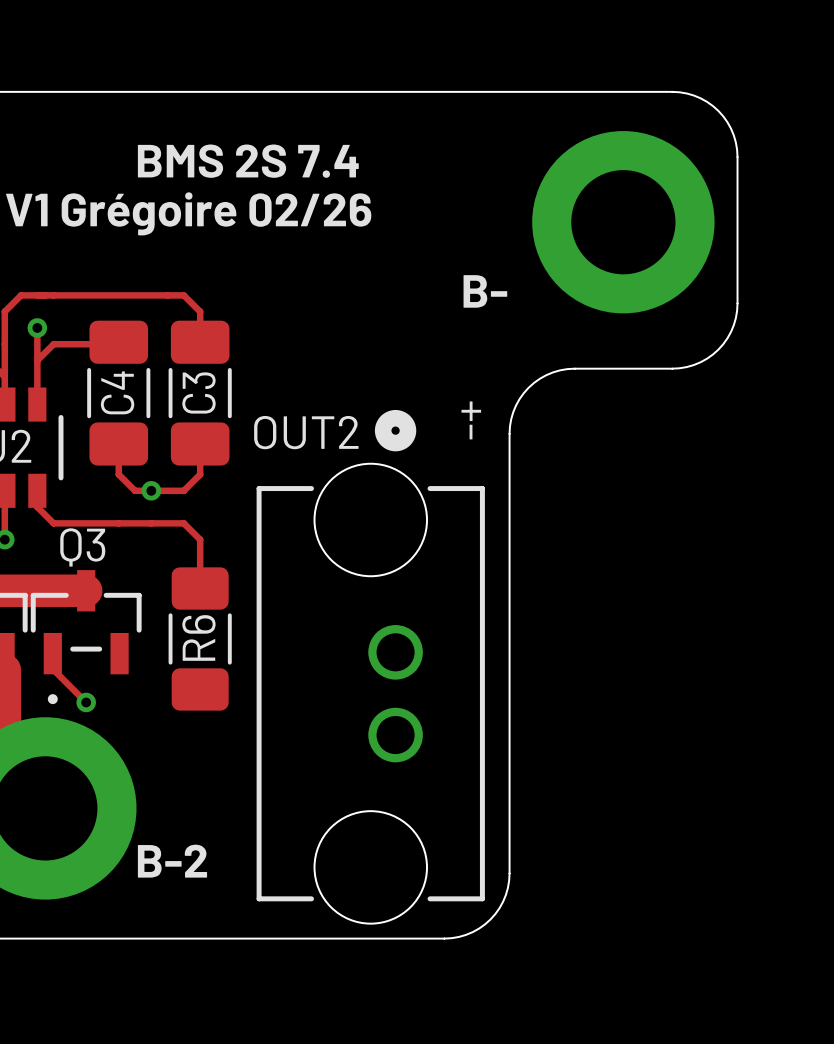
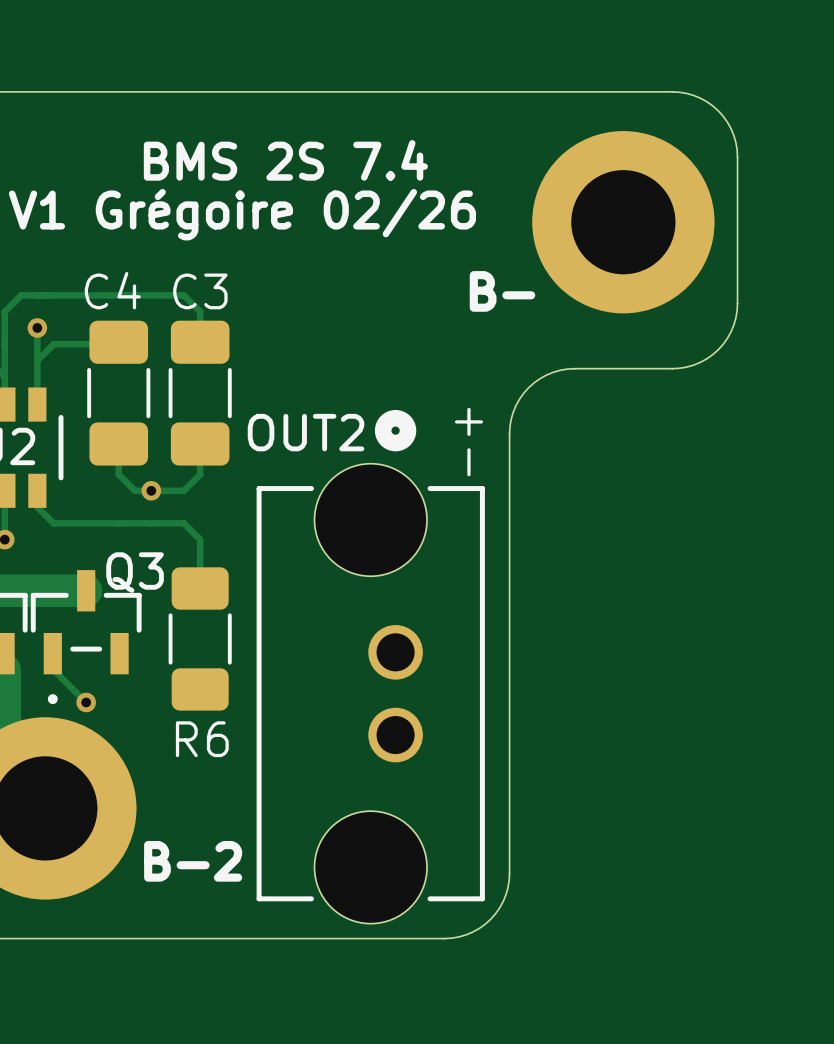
text: none -> C4 C3 (156, 290)
C4 name: C4 (117, 392) -> none
C3 name: C3 (198, 392) -> none
Q3 name position: Q3 (82, 547) -> Q3 (135, 572)
R6 name: R6 (198, 637) -> none
text: none -> R6 (202, 739)

